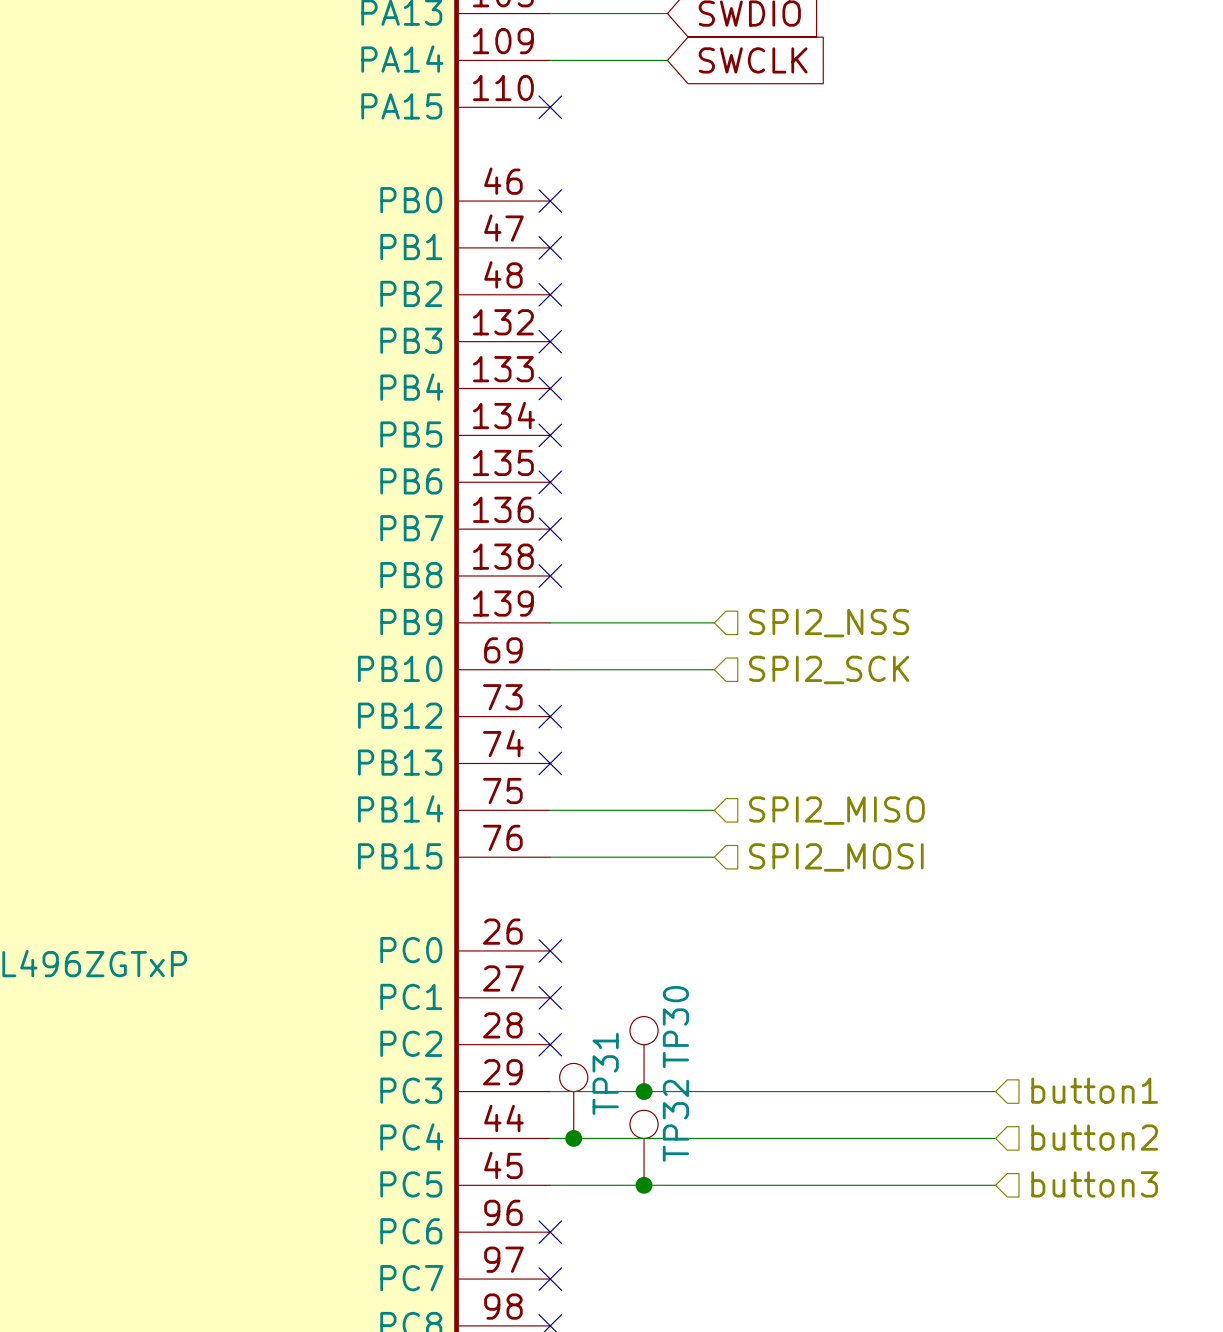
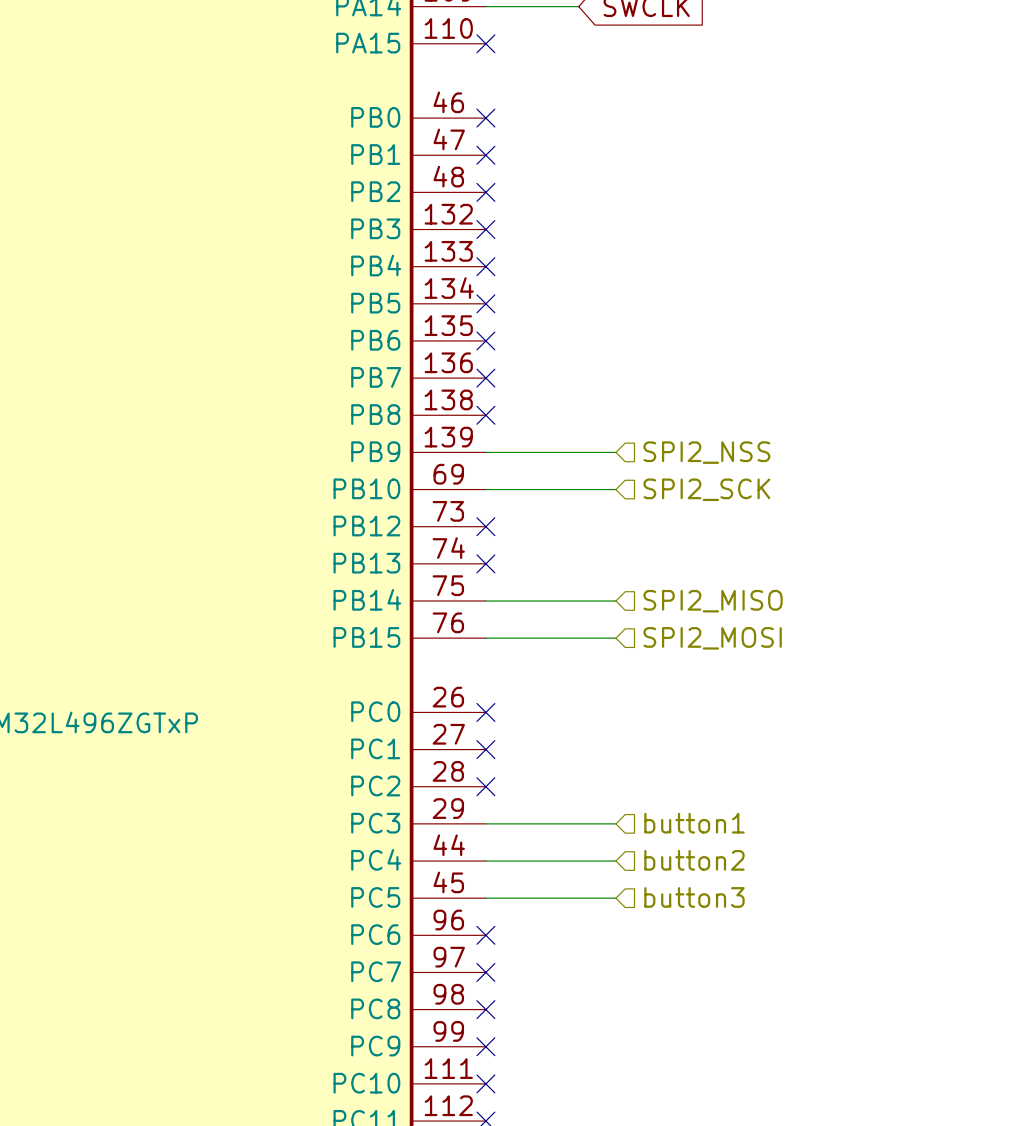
TP30: (644, 1054) -> none
hierarchical label position: button1 (1094, 1090) -> button1 (694, 823)
junction: (644, 1091) -> none
wire: (714, 1091) (995, 1091) -> none
TP31: (573, 1100) -> none
hierarchical label position: button2 (1094, 1137) -> button2 (694, 860)
junction: (573, 1138) -> none
wire: (714, 1138) (995, 1138) -> none
TP32: (644, 1147) -> none
hierarchical label position: button3 (1094, 1184) -> button3 (694, 897)
junction: (644, 1185) -> none
wire: (714, 1185) (995, 1185) -> none

